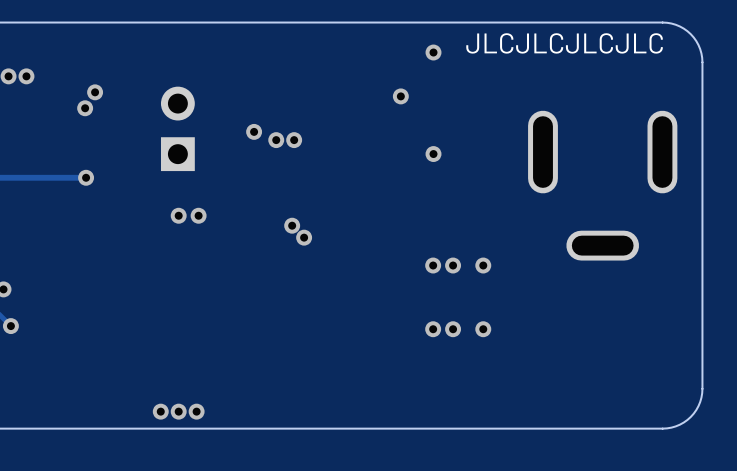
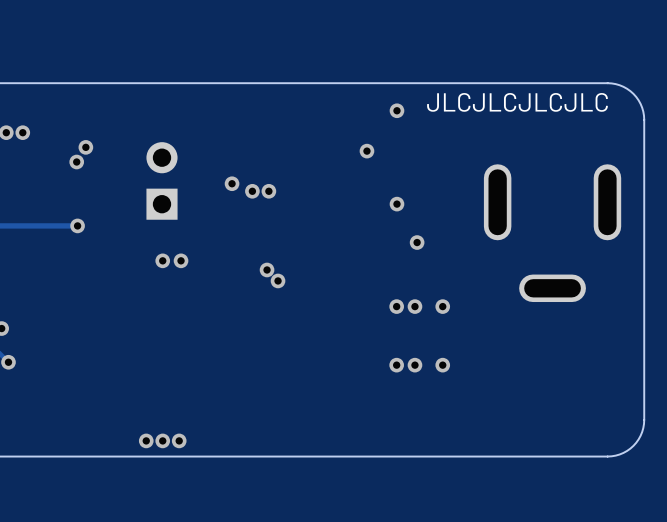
via: none -> (417, 242)

